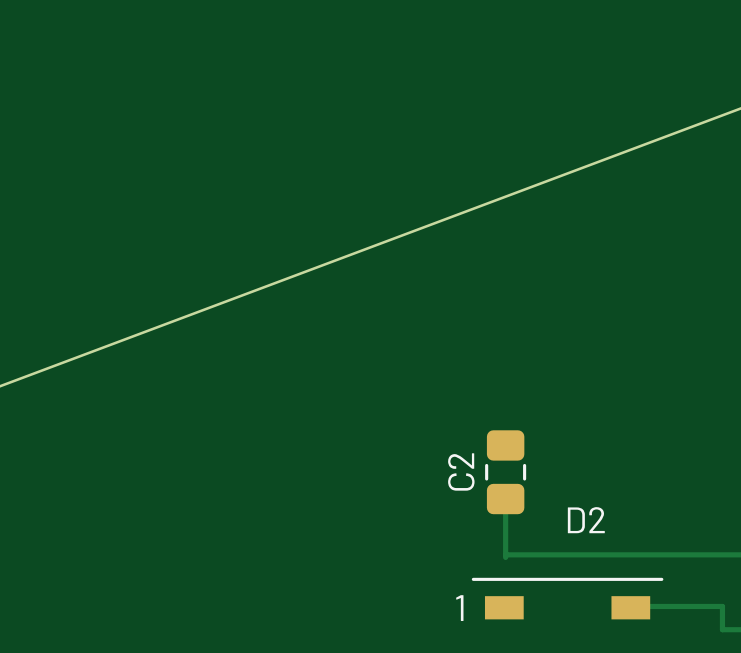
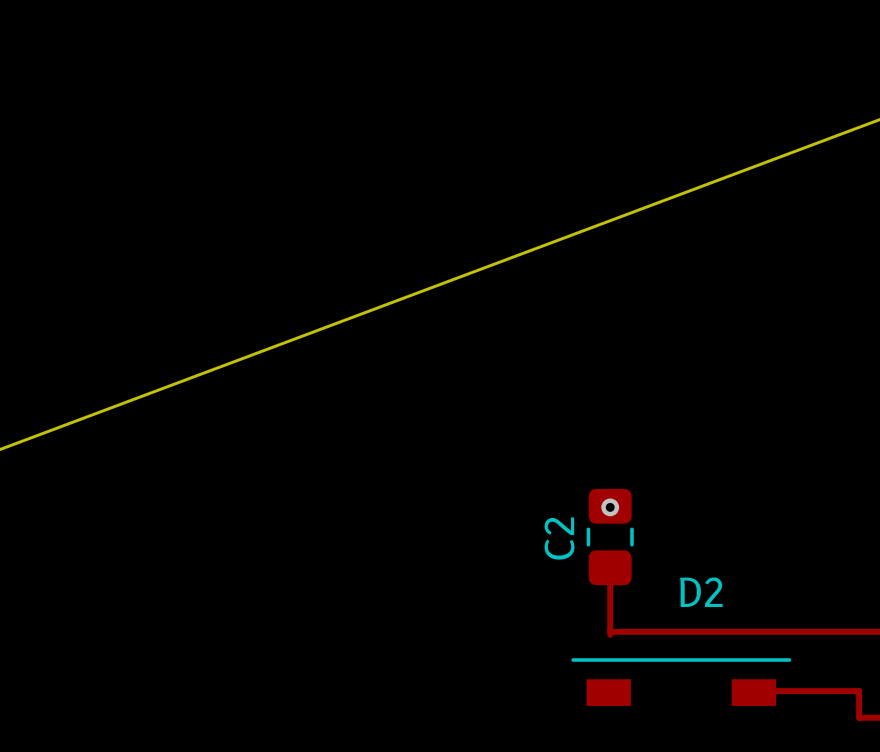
via: none -> (610, 507)
D2 text: 1 (459, 608) -> none

